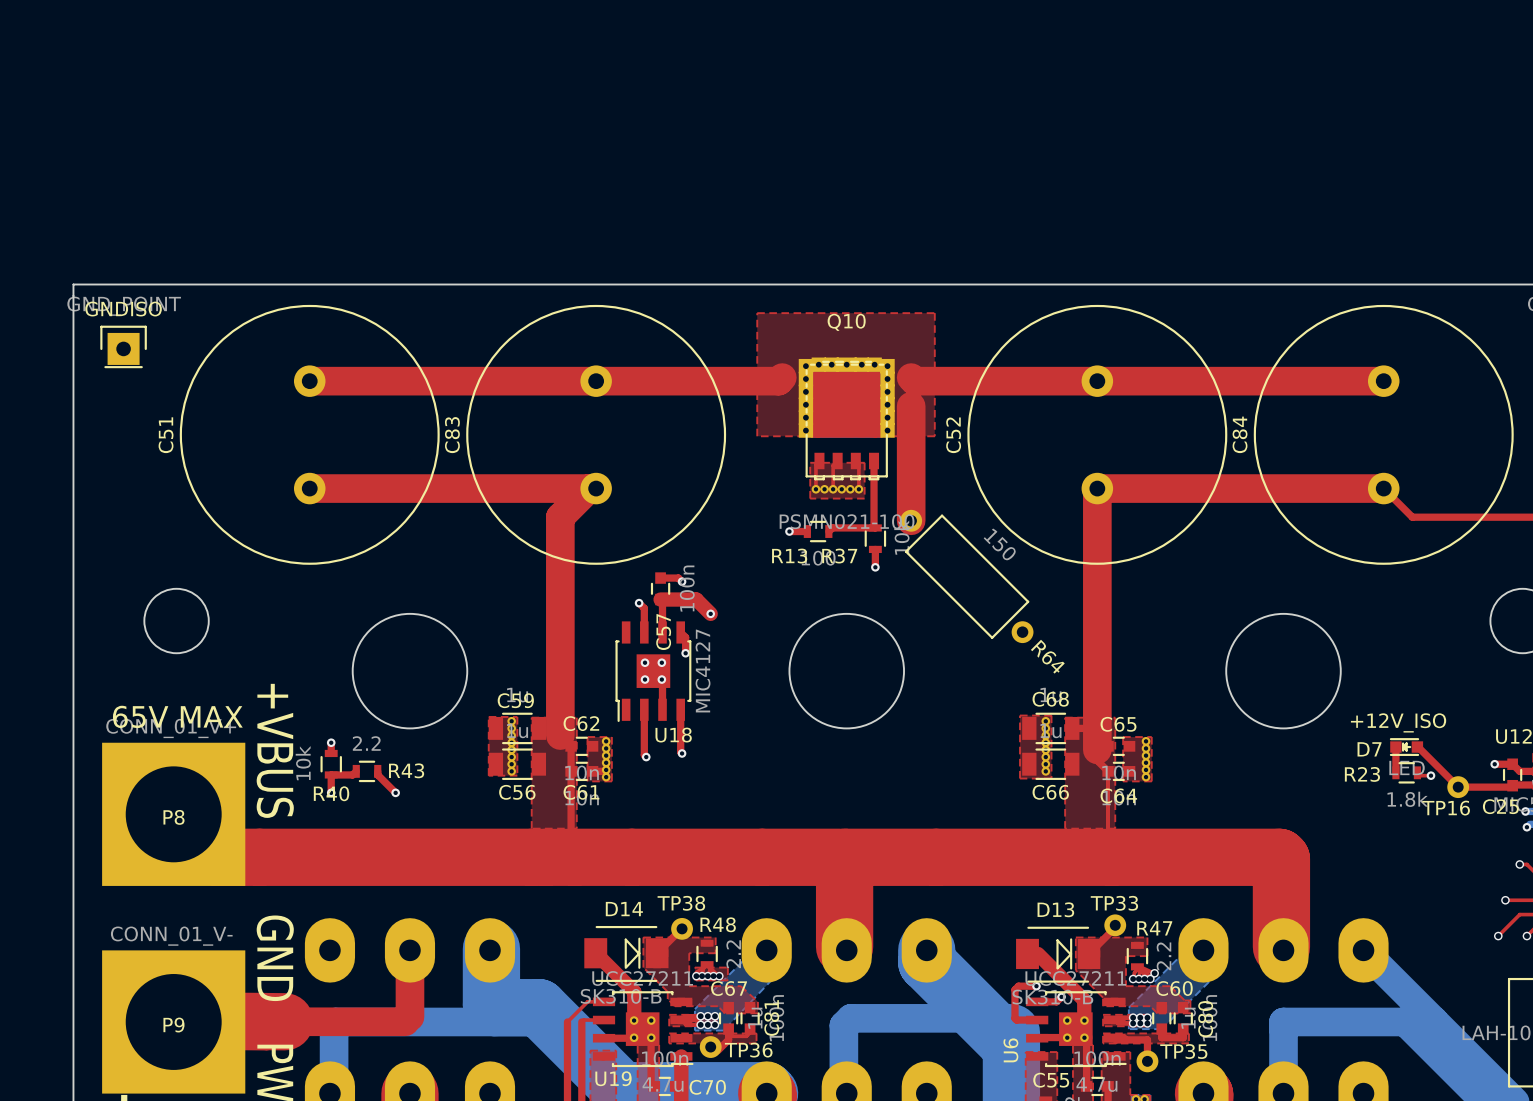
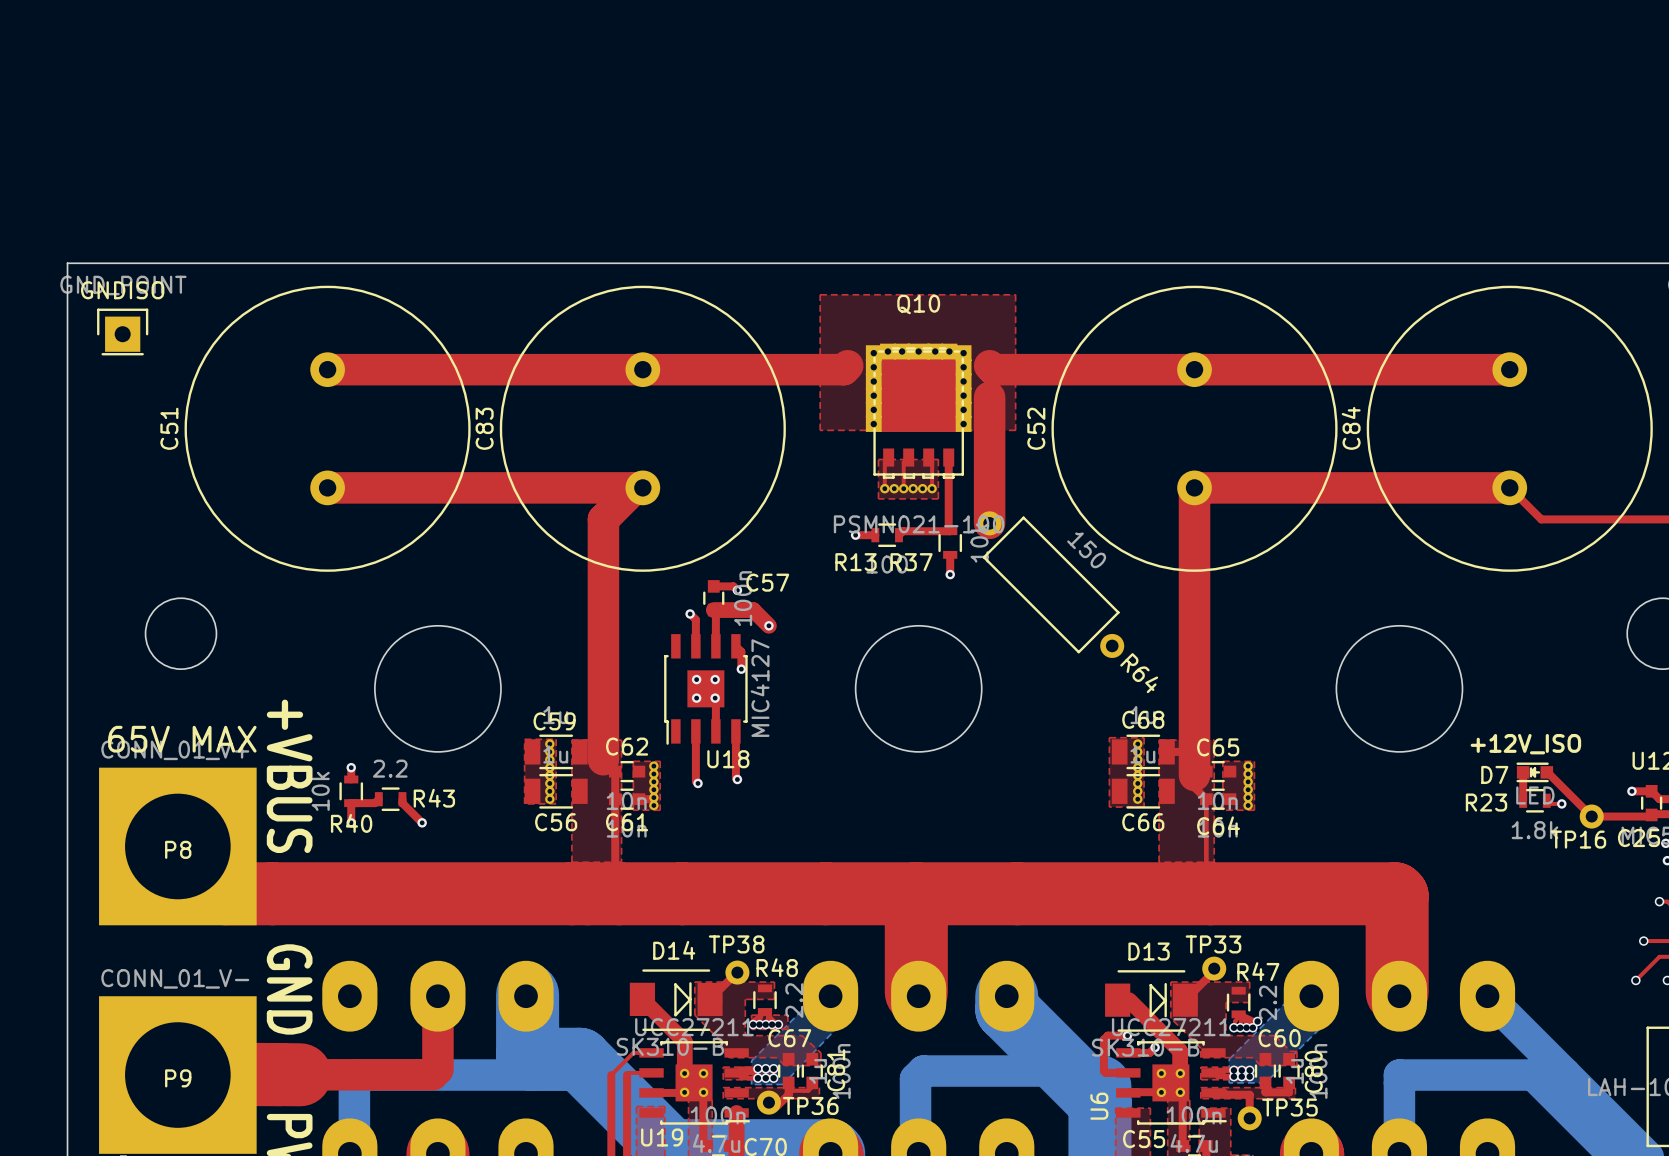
C57 name rotation: 0° (663, 632) -> 90° clockwise (767, 582)
C57 name position: C57 (663, 632) -> C57 (767, 582)

